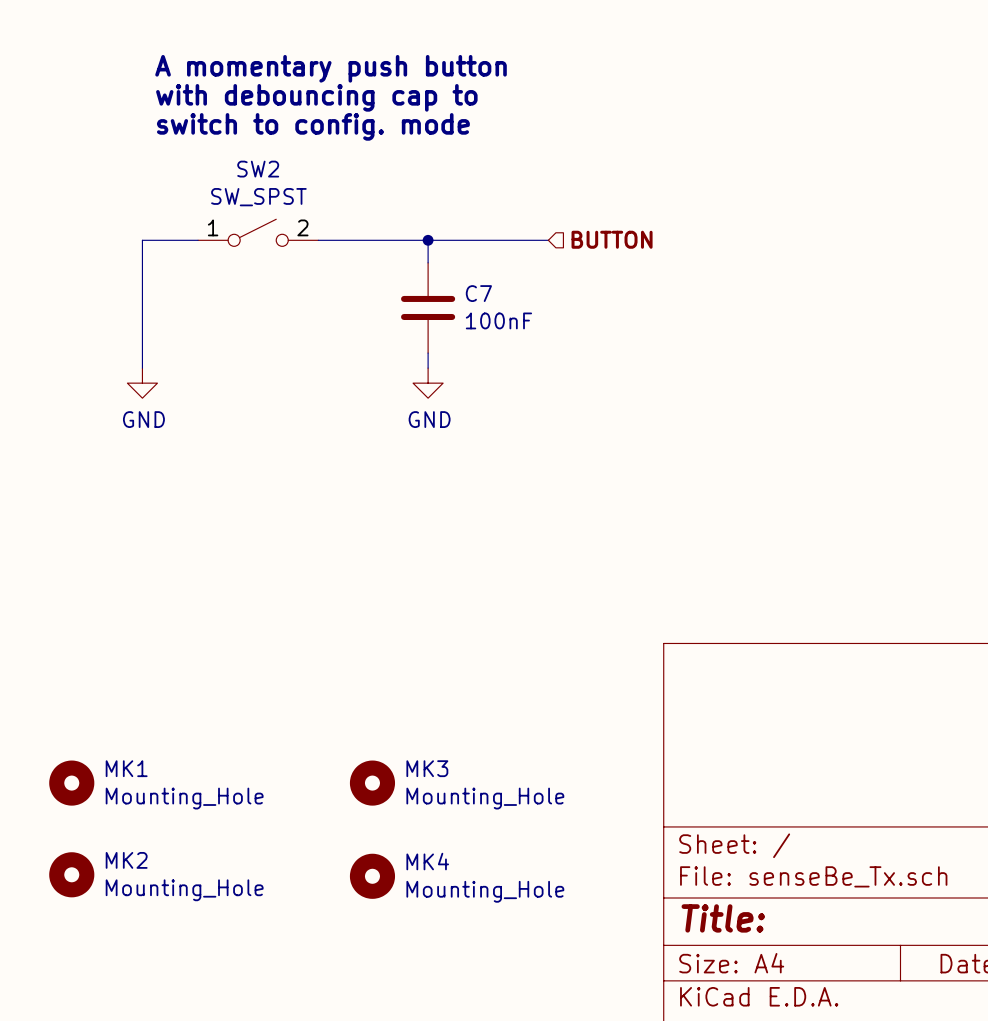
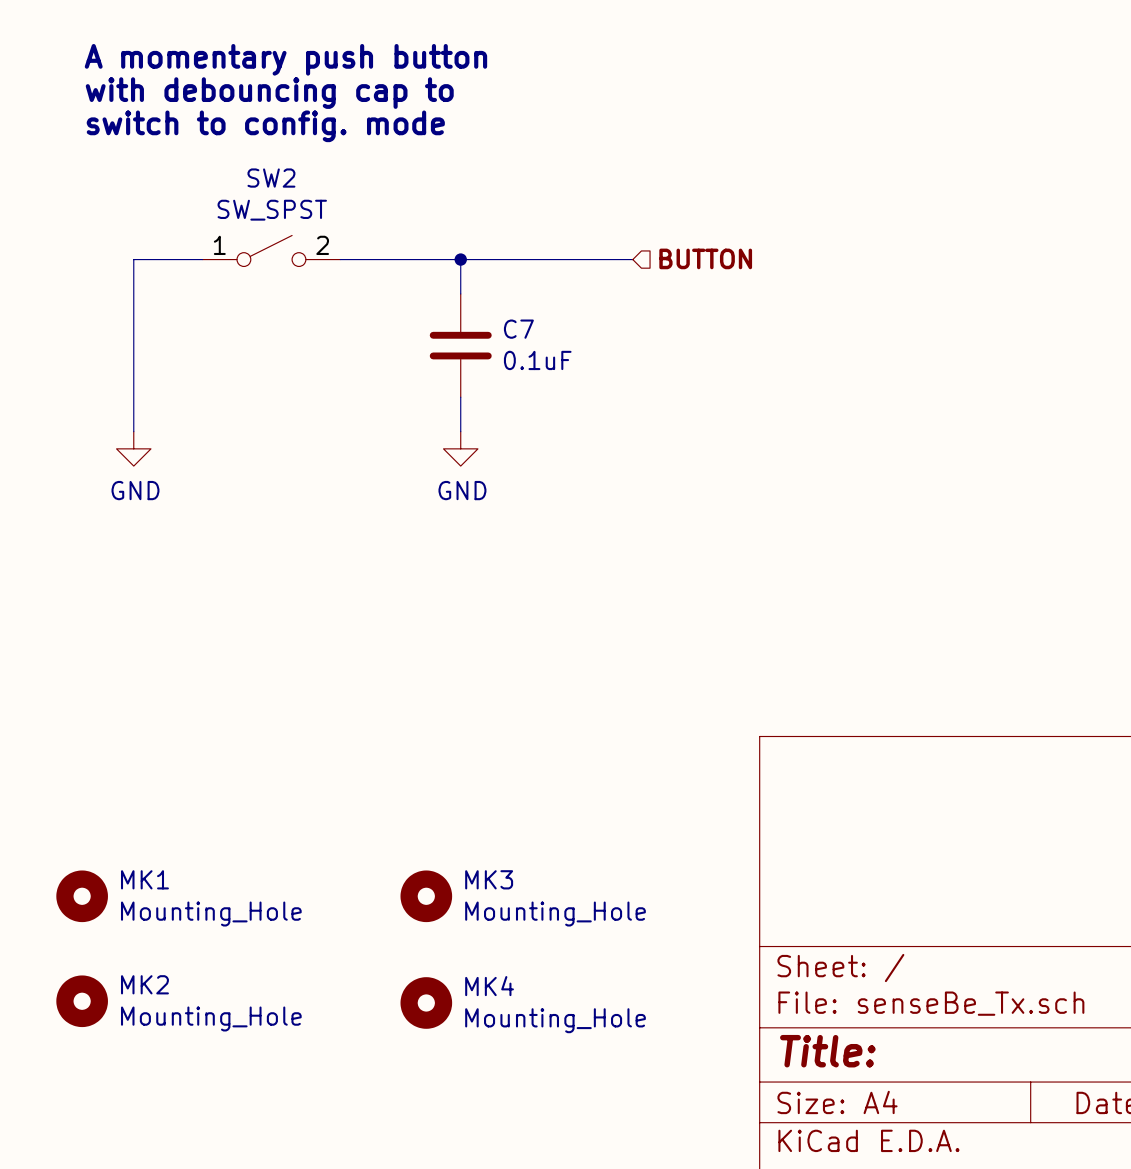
text position: A momentary push button (331, 68) -> A momentary push button (285, 59)
text position: with debouncing cap to (316, 97) -> with debouncing cap to (269, 93)
text position: switch to config. mode (313, 126) -> switch to config. mode (265, 126)
wire: none -> (202, 259) (133, 259) (133, 431)
wire: none -> (340, 259) (632, 259)
wire: none -> (460, 259) (460, 293)
SW2 position: (258, 232) -> (271, 250)
hierarchical label position: BUTTON (612, 239) -> BUTTON (705, 258)
wire: (198, 240) (142, 240) (142, 368) -> none
wire: (318, 240) (548, 240) -> none
wire: (428, 240) (428, 262) -> none
junction position: (428, 240) -> (460, 259)
C7 position: (428, 307) -> (460, 345)
C7 value: 100nF (498, 320) -> 0.1uF (537, 360)
wire: none -> (460, 397) (460, 431)
wire: (428, 353) (428, 368) -> none
power symbol position: GND (142, 383) -> GND (133, 448)
power symbol position: GND (428, 383) -> GND (460, 448)

